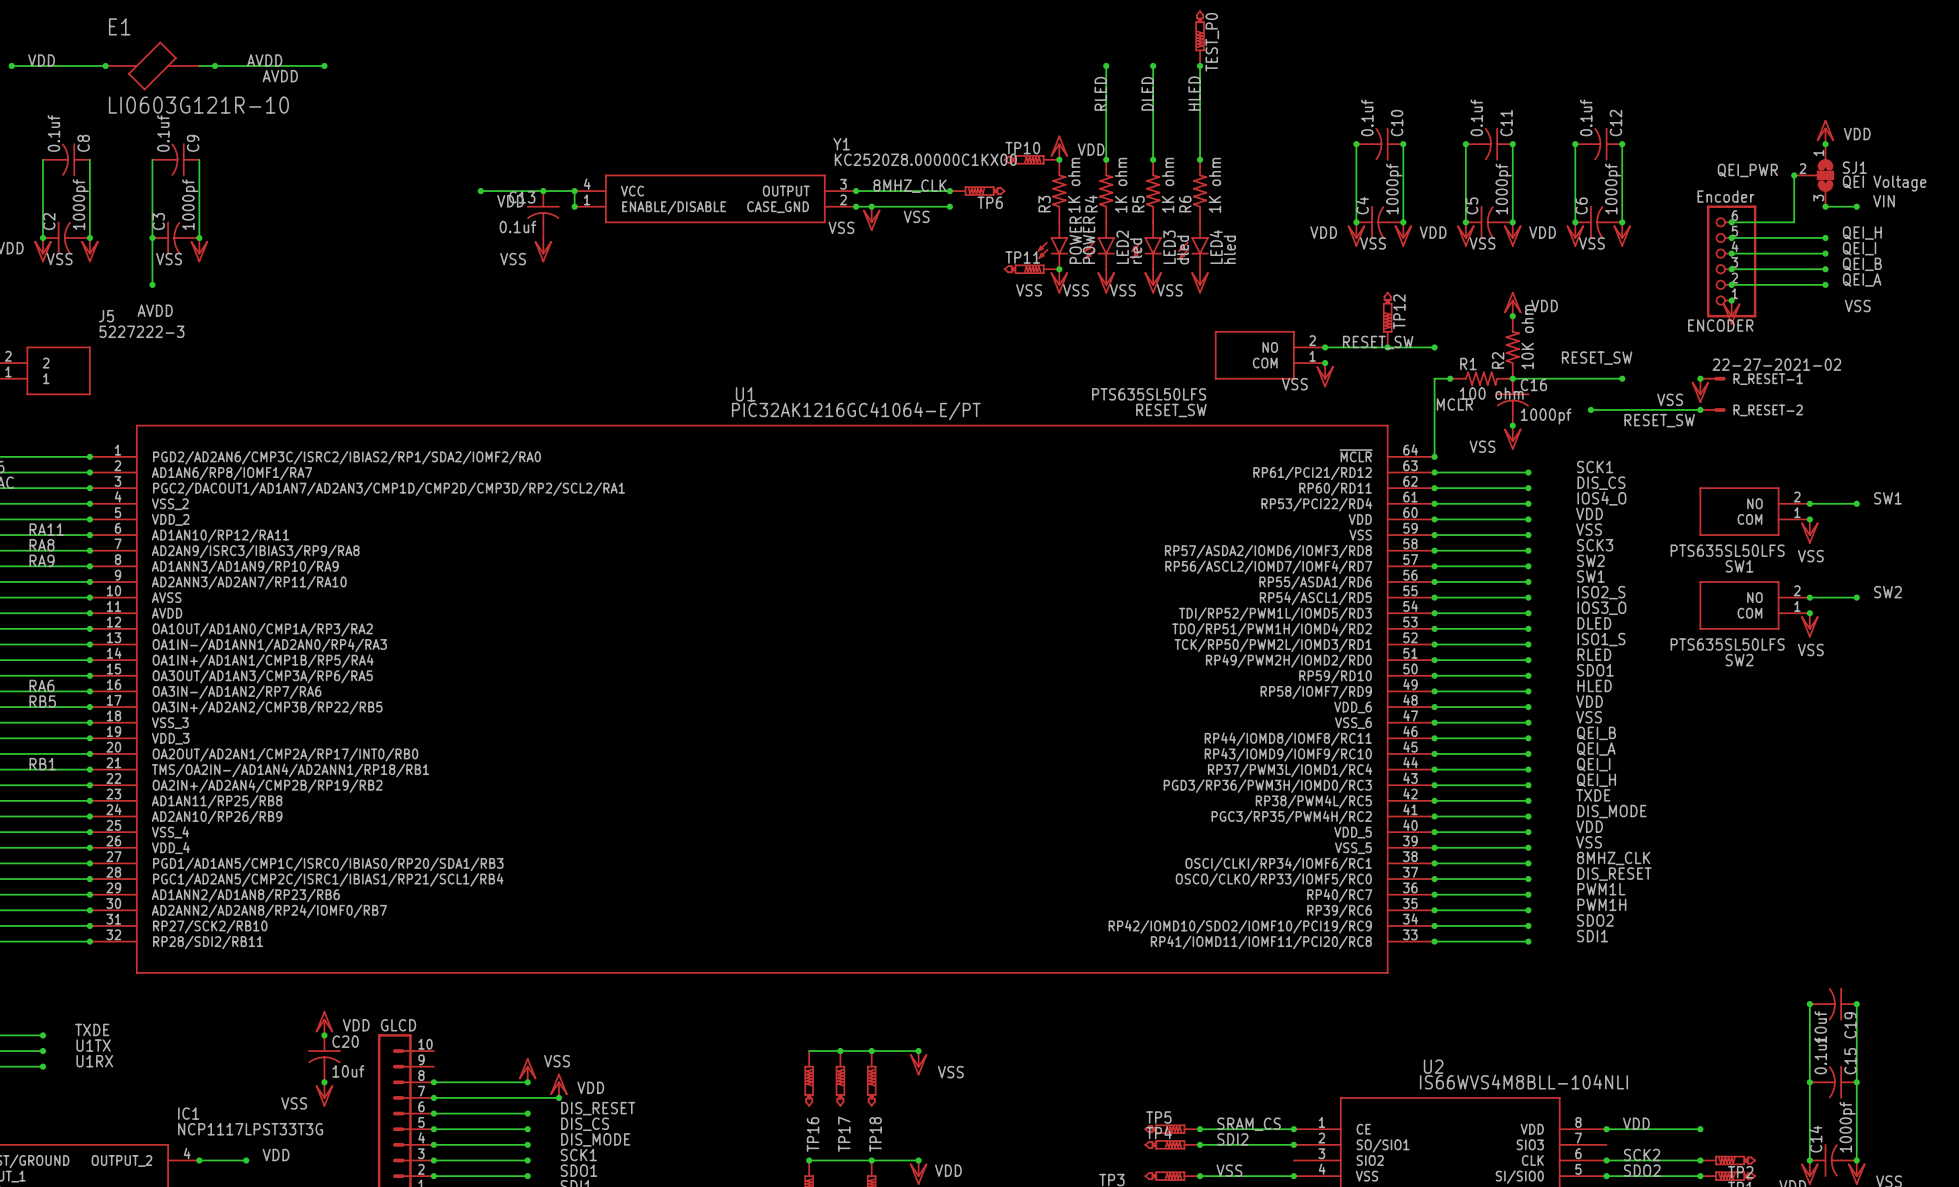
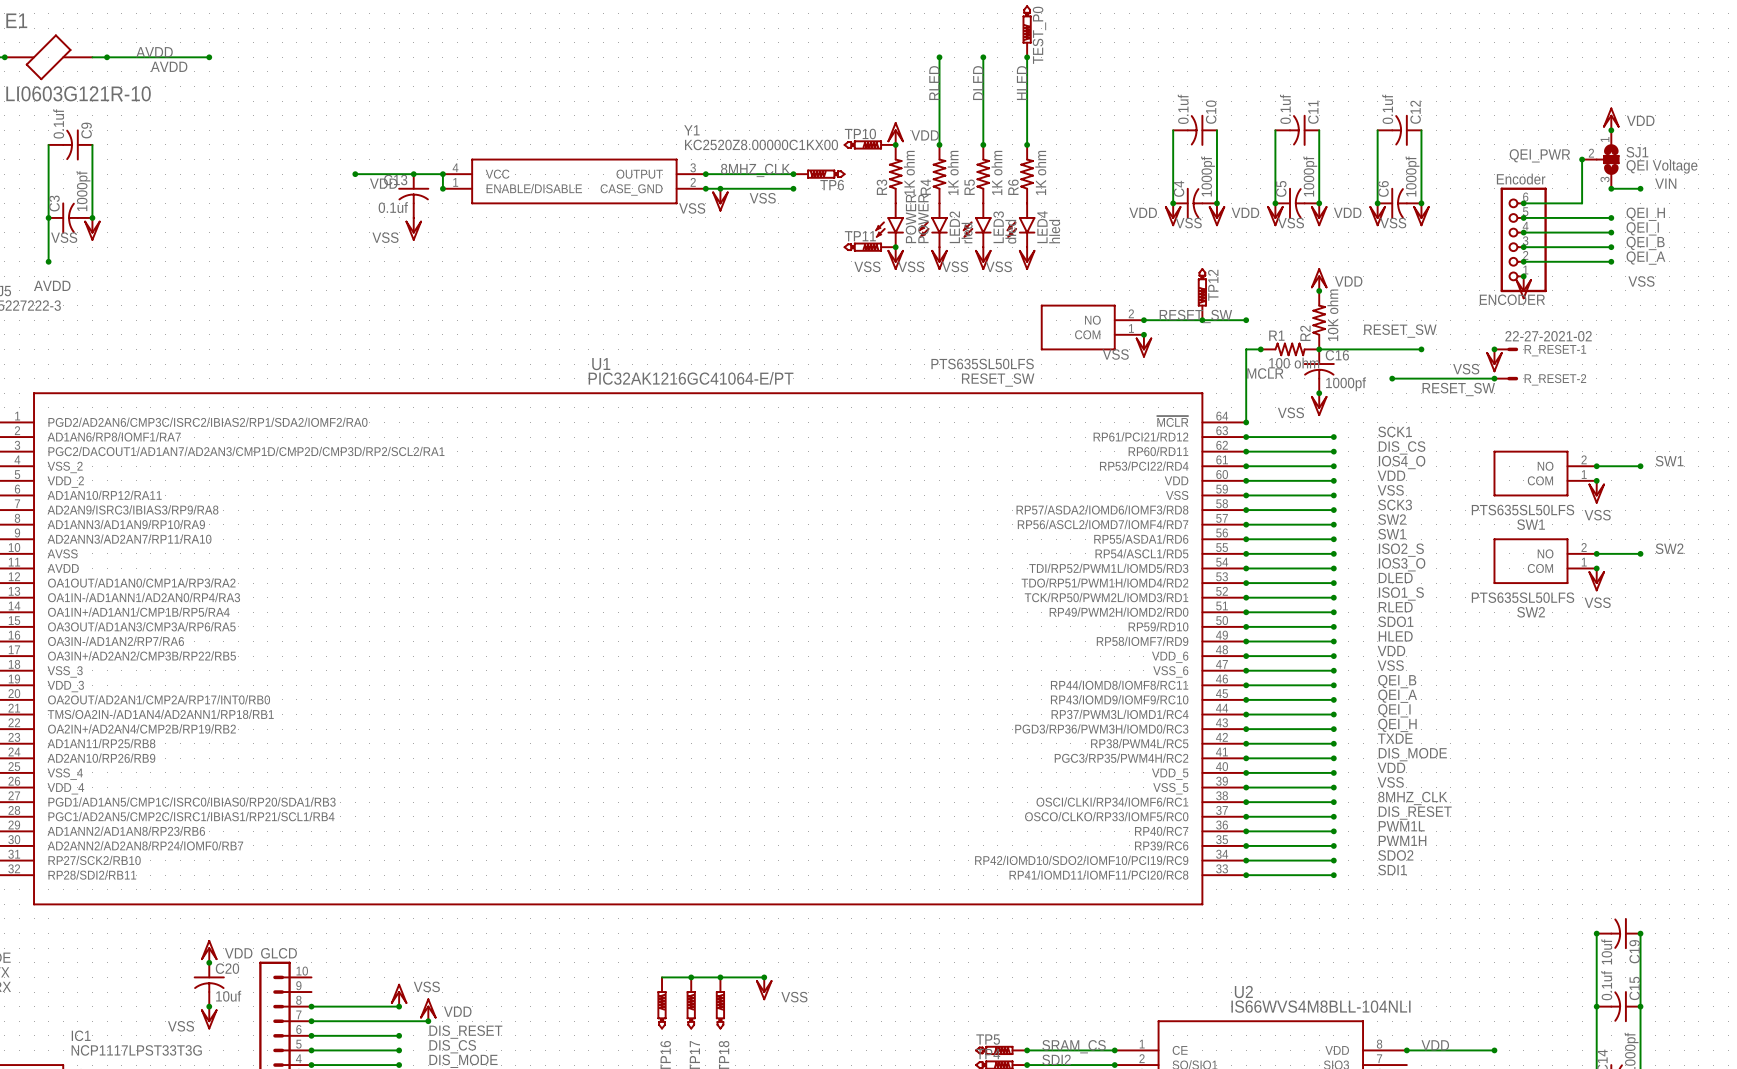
junction: (1356, 144) -> none
junction: (1403, 144) -> none
junction: (1465, 144) -> none
junction: (1512, 144) -> none
junction: (1575, 144) -> none
junction: (1622, 144) -> none

